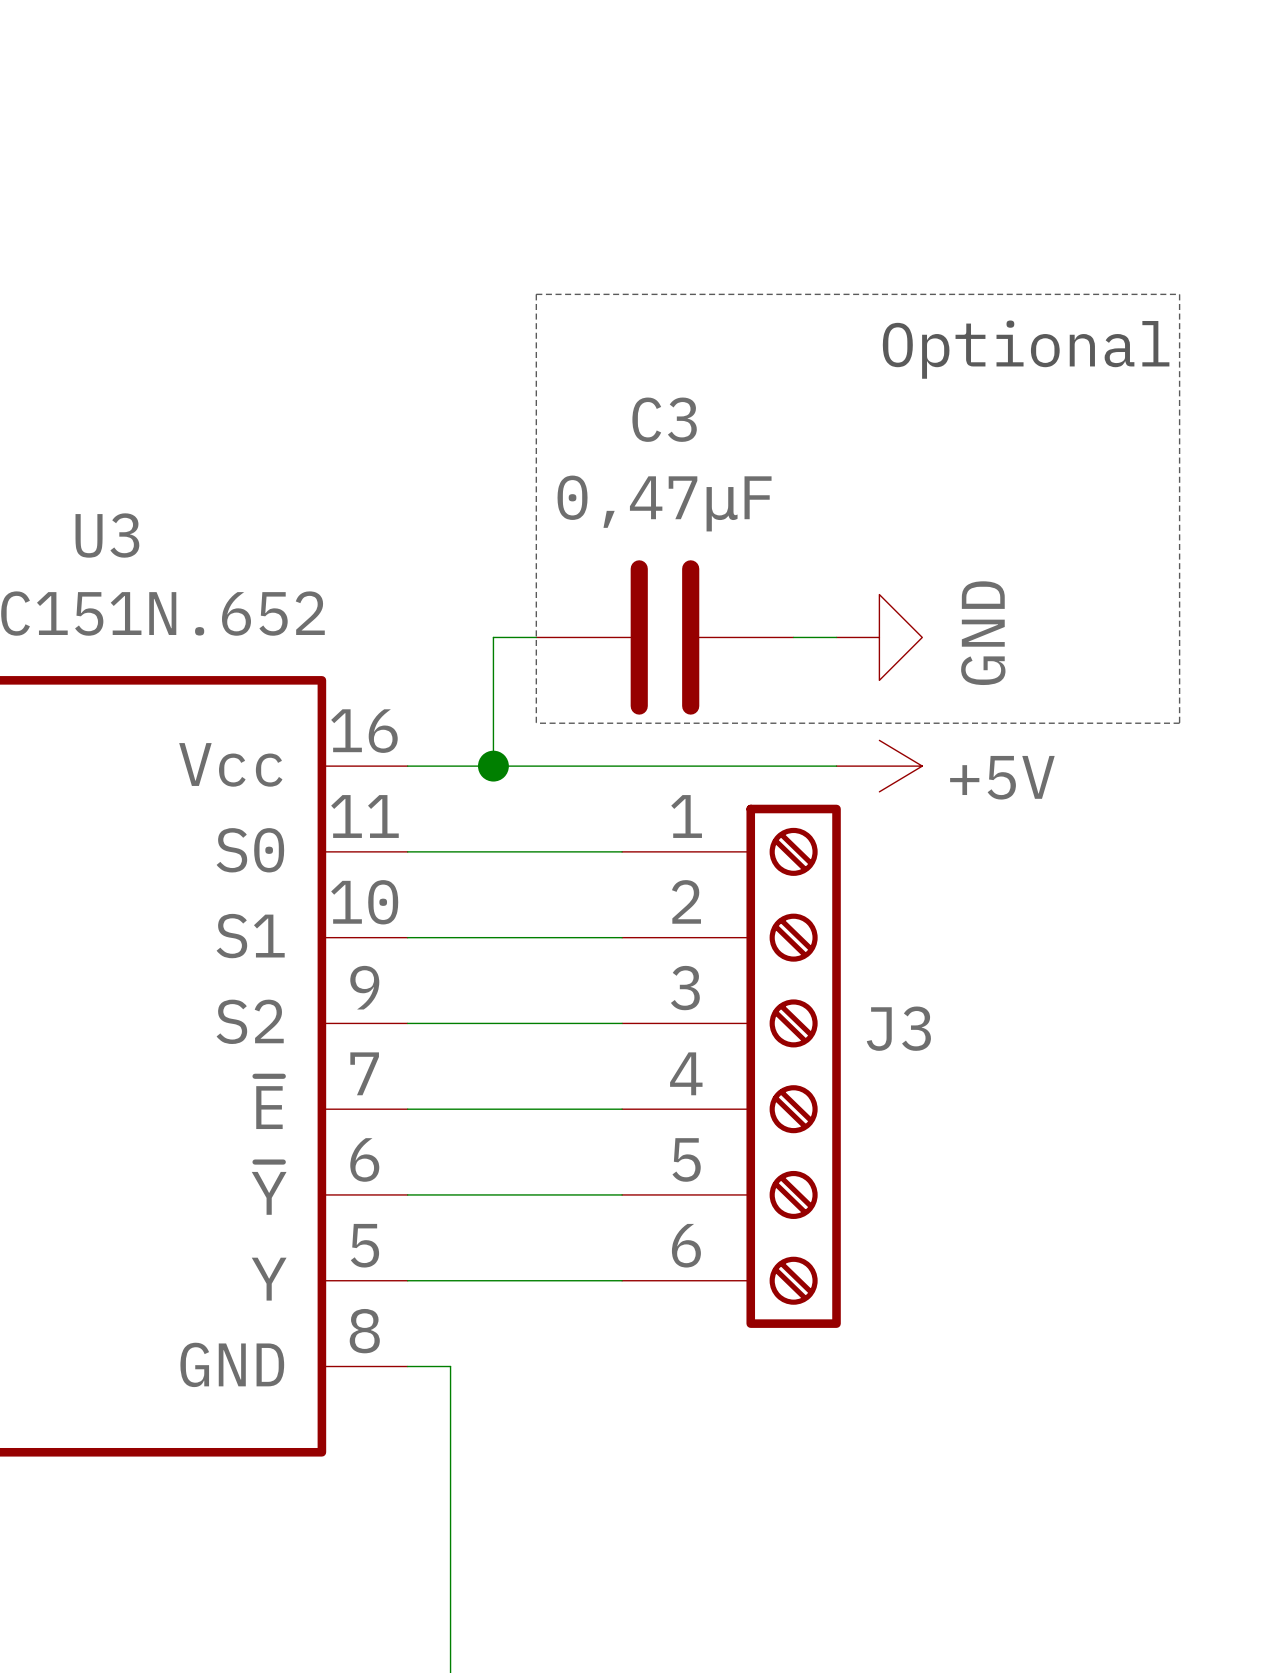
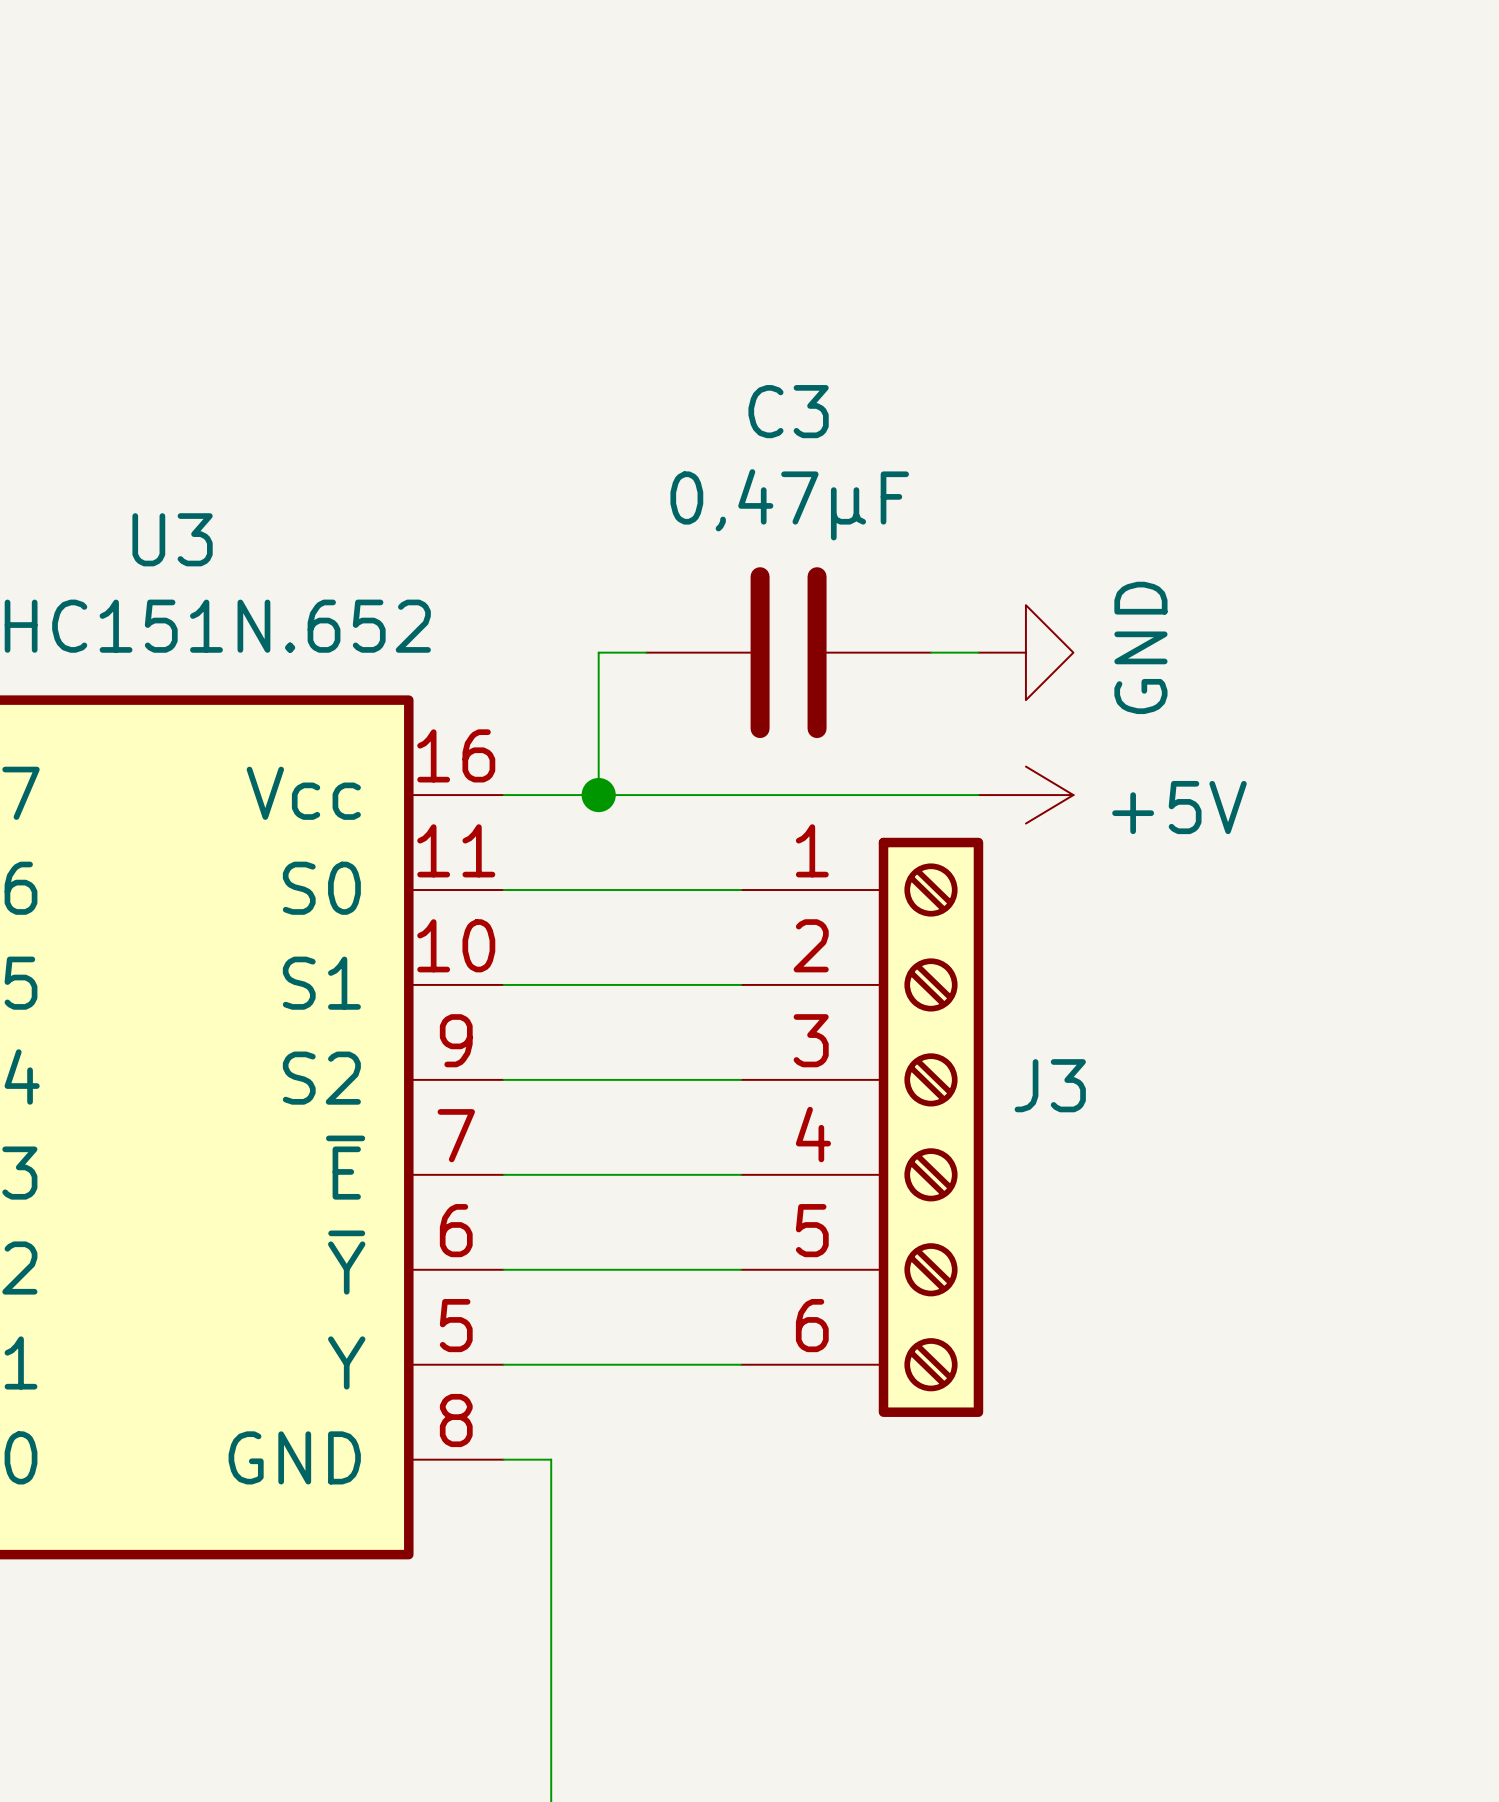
line: (536, 294) (536, 723) (1179, 723) (1179, 294) (536, 294) -> none
text: Optional (1026, 349) -> none

